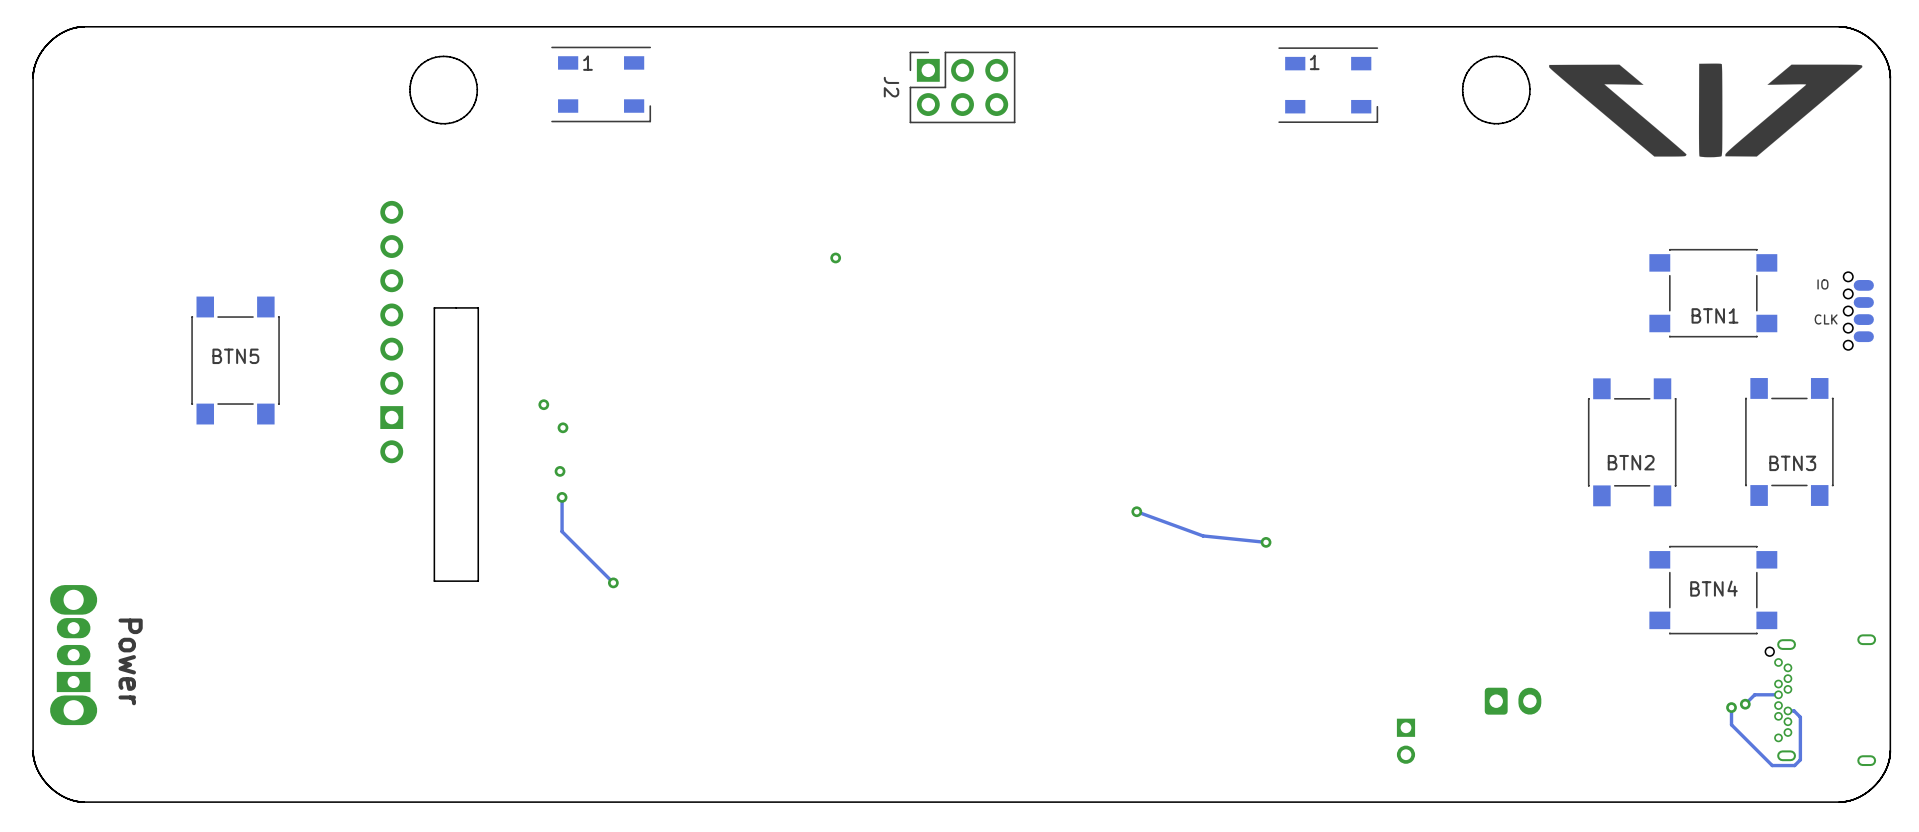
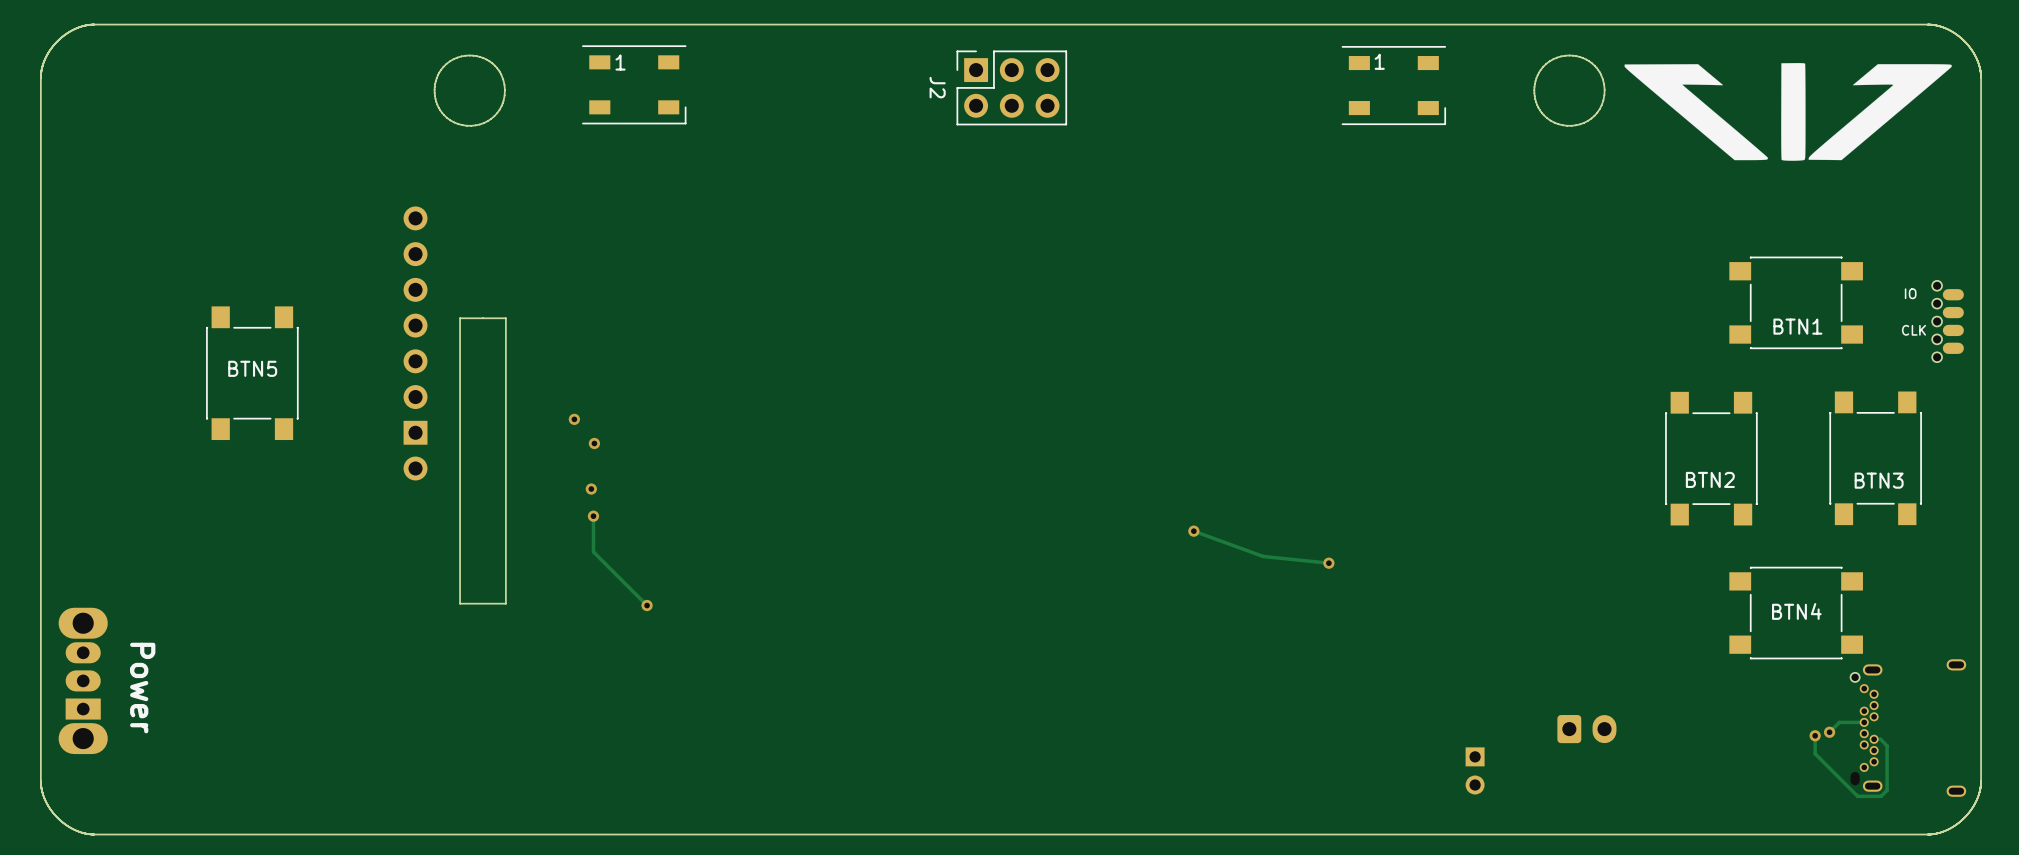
via: (835, 257) -> none

